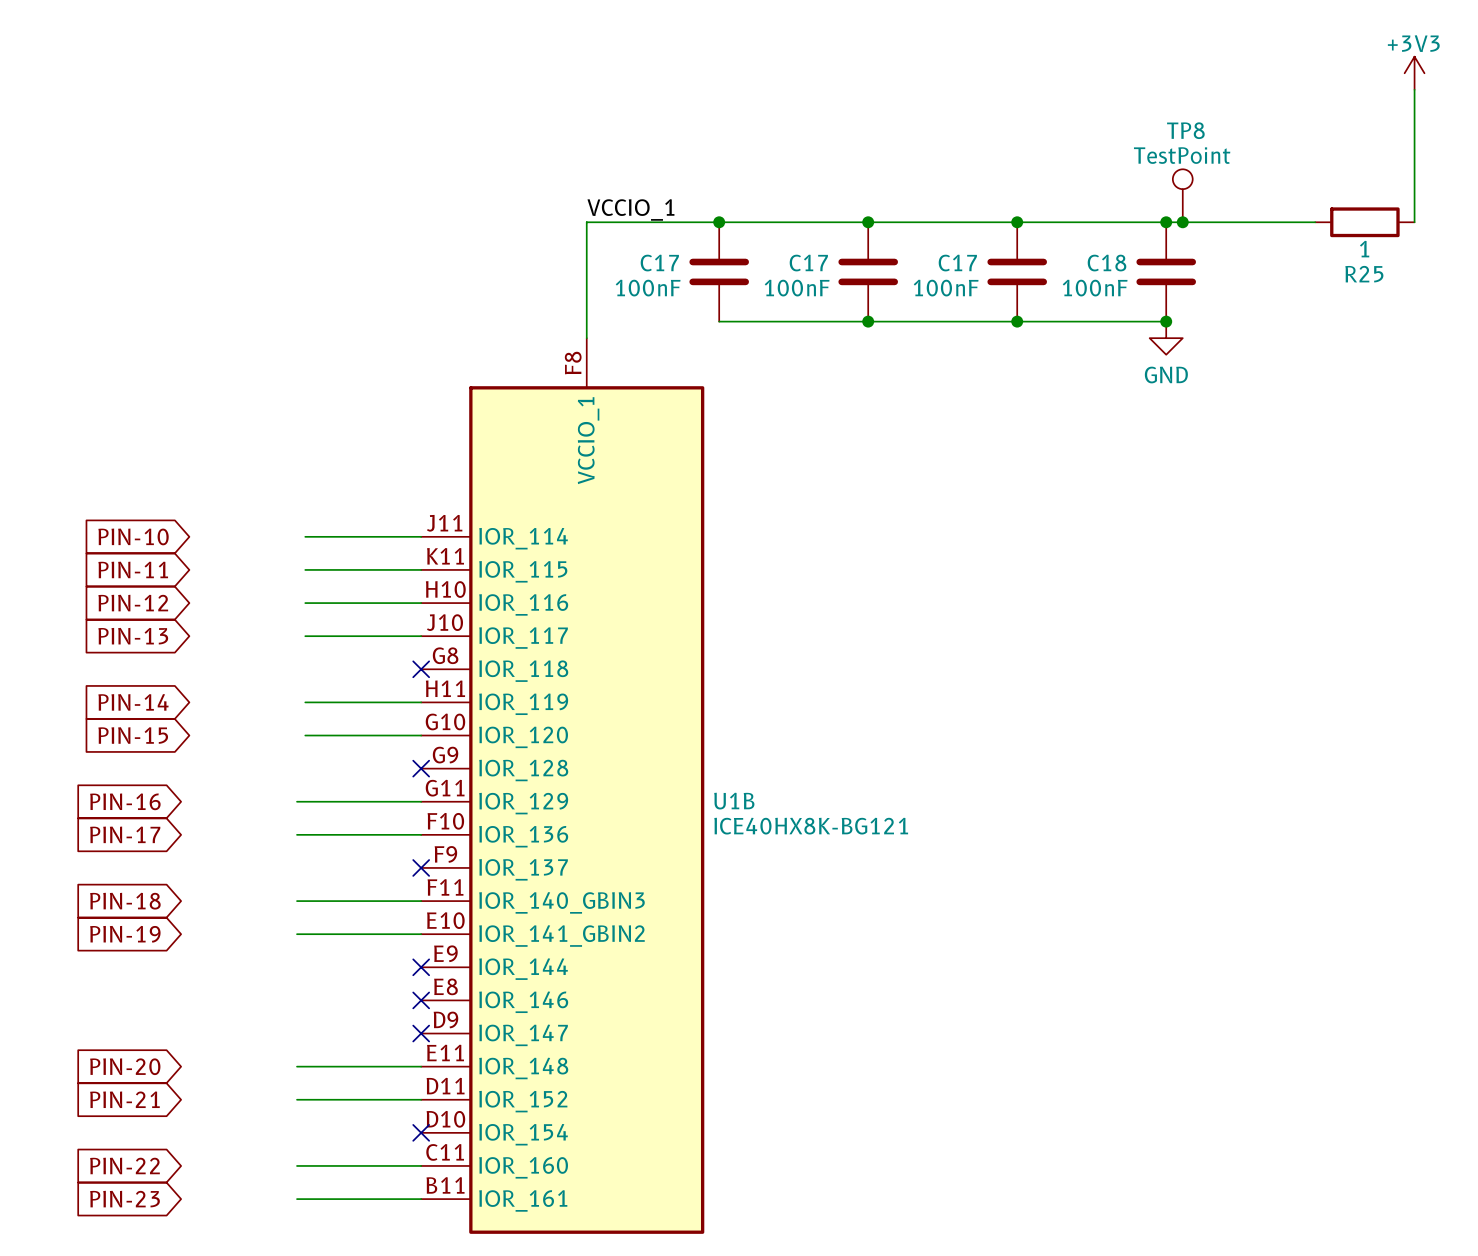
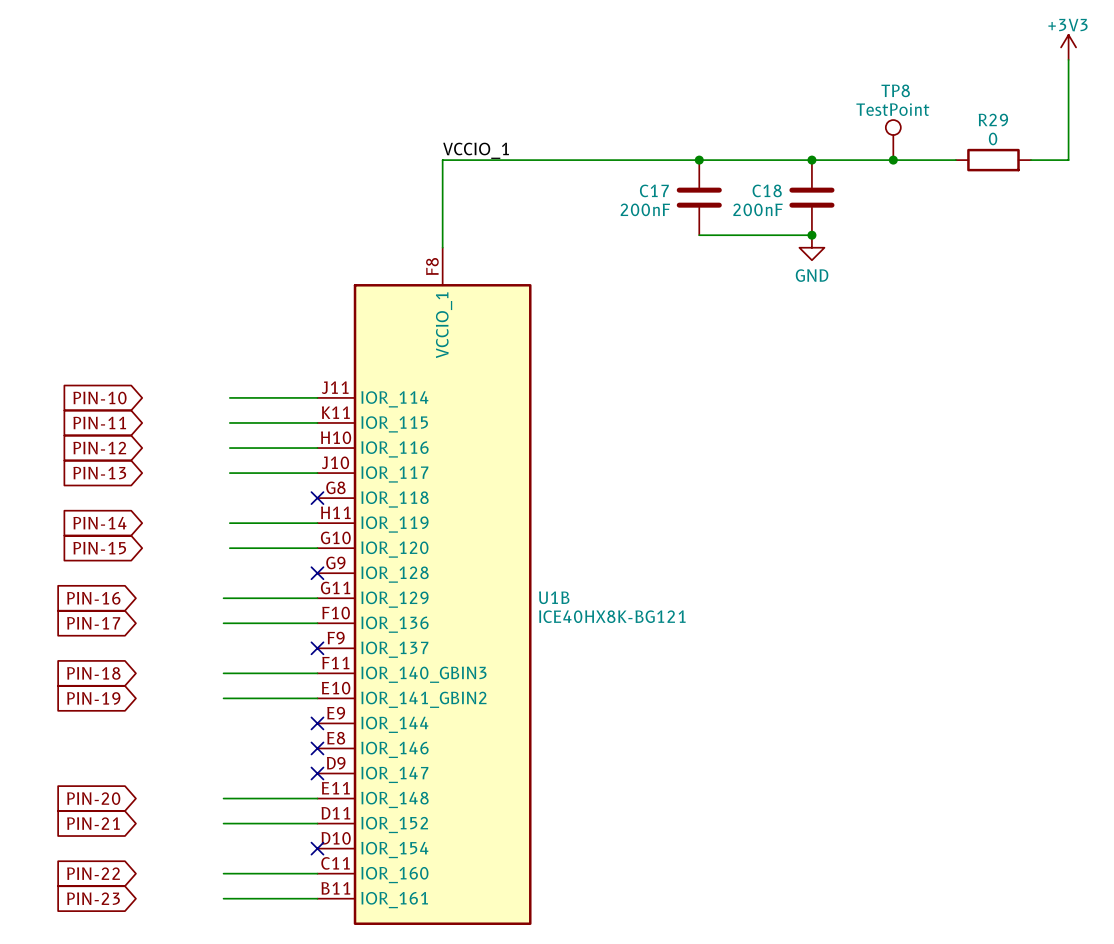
junction: (719, 222) -> none
junction: (868, 222) -> none
junction: none -> (699, 160)
junction: (1017, 222) -> none
junction: none -> (811, 160)
junction: (1166, 222) -> none
wire: (1265, 222) (1315, 222) -> (1031, 160) (1068, 160)
R29: none -> 0 (993, 160)
R25: 1 (1364, 222) -> none
C17: 100nF (719, 271) -> none
C17: 100nF (868, 271) -> none
C17: none -> 200nF (699, 197)
C17: 100nF (1017, 271) -> none
C18 position: (1166, 271) -> (811, 197)
C18 value: 100nF (1095, 288) -> 200nF (758, 209)
wire: (719, 321) (926, 321) -> none
junction: (868, 321) -> none
junction: (1017, 321) -> none
wire: (1075, 321) (1166, 321) -> none
junction: none -> (811, 235)
junction: (1166, 321) -> none
power symbol position: GND (1166, 338) -> GND (811, 247)

